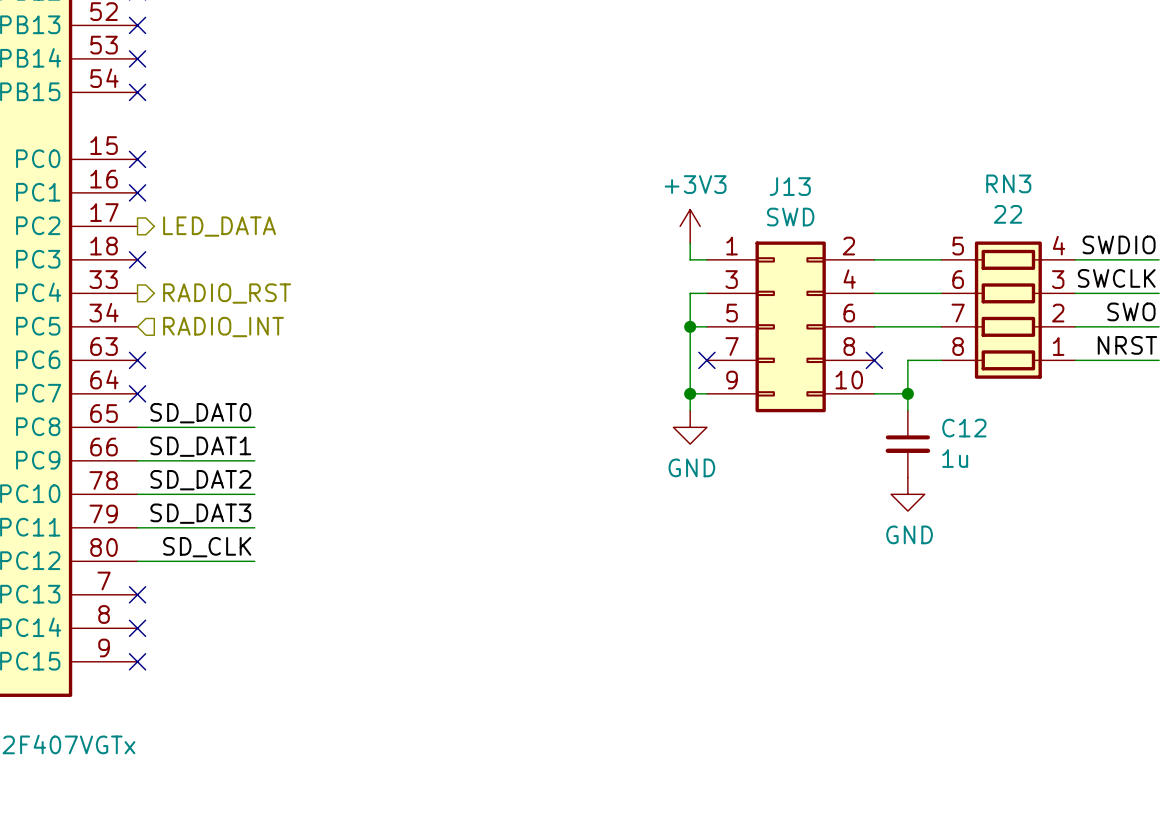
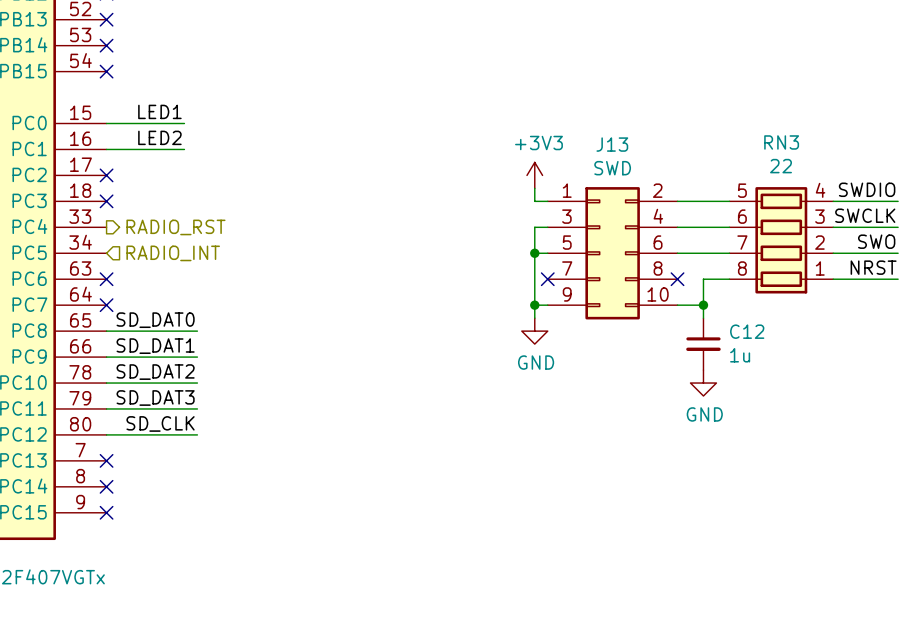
label: none -> LED1 (159, 111)
wire: none -> (106, 123) (184, 123)
no-connect mark: (137, 159) -> none
label: none -> LED2 (159, 137)
wire: none -> (106, 149) (184, 149)
no-connect mark: (137, 192) -> none
no-connect mark: none -> (106, 175)
hierarchical label: LED_DATA (219, 226) -> none

